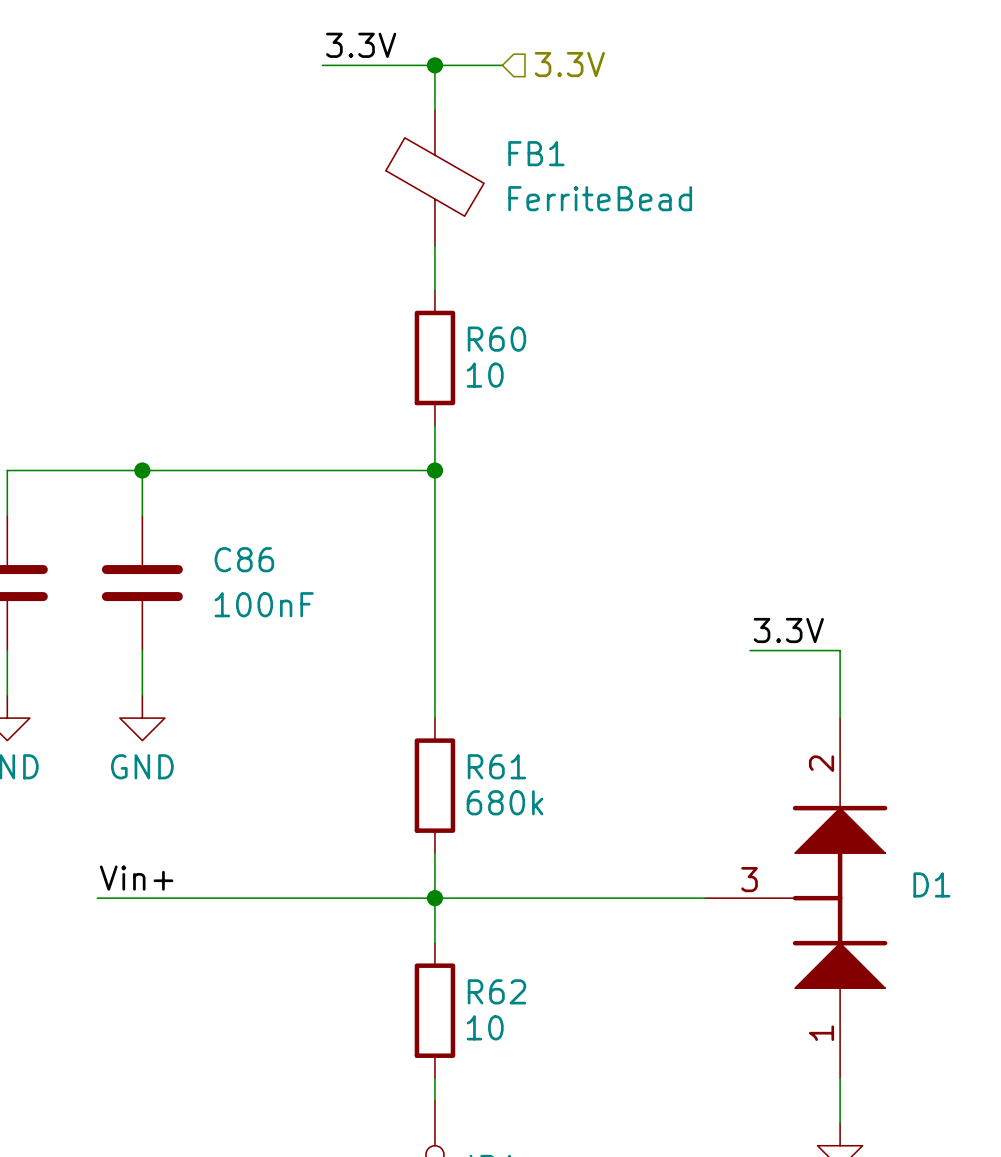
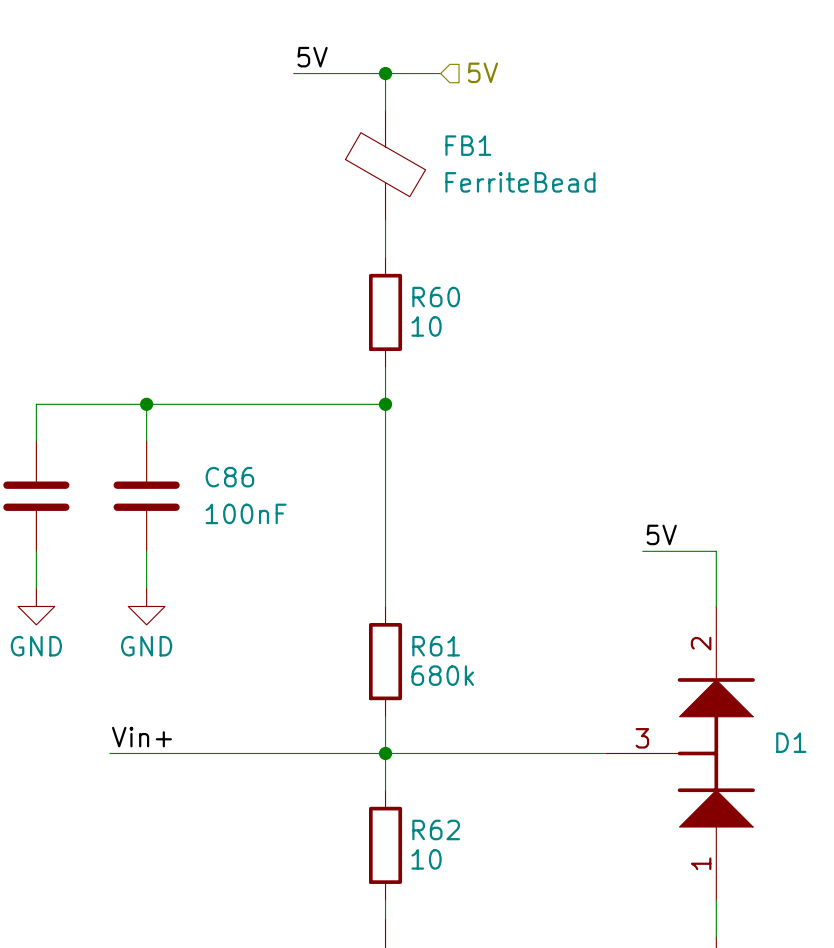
label: 3.3V (361, 45) -> 5V (312, 57)
hierarchical label: 3.3V (569, 64) -> 5V (482, 72)
label: 3.3V (788, 630) -> 5V (661, 534)

